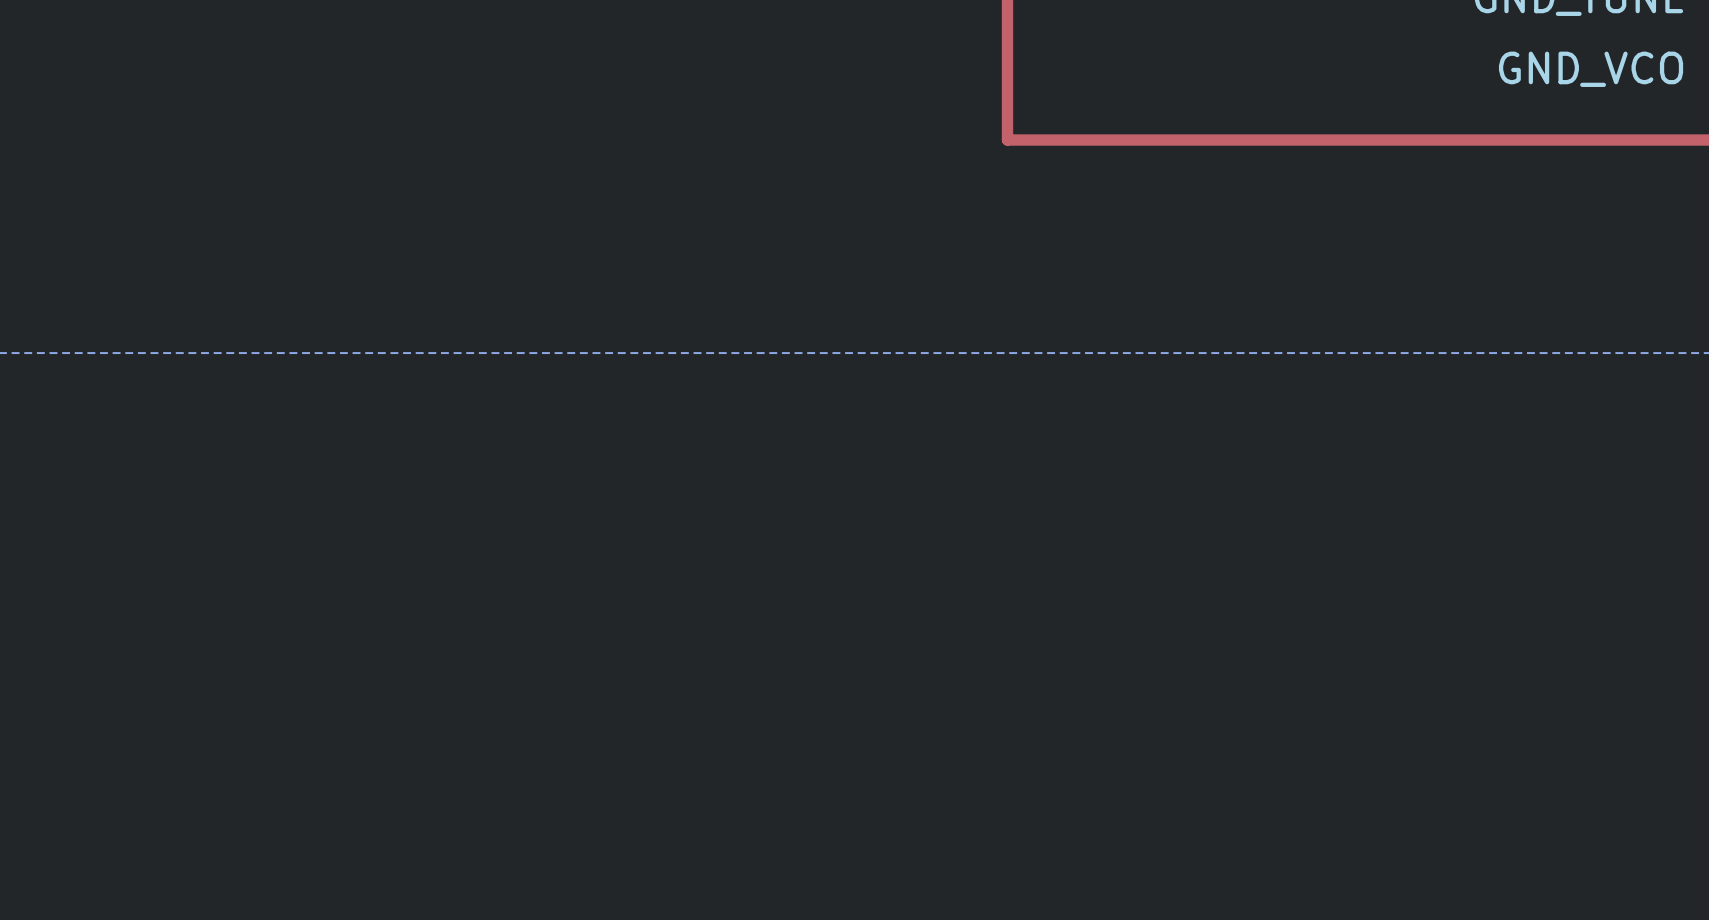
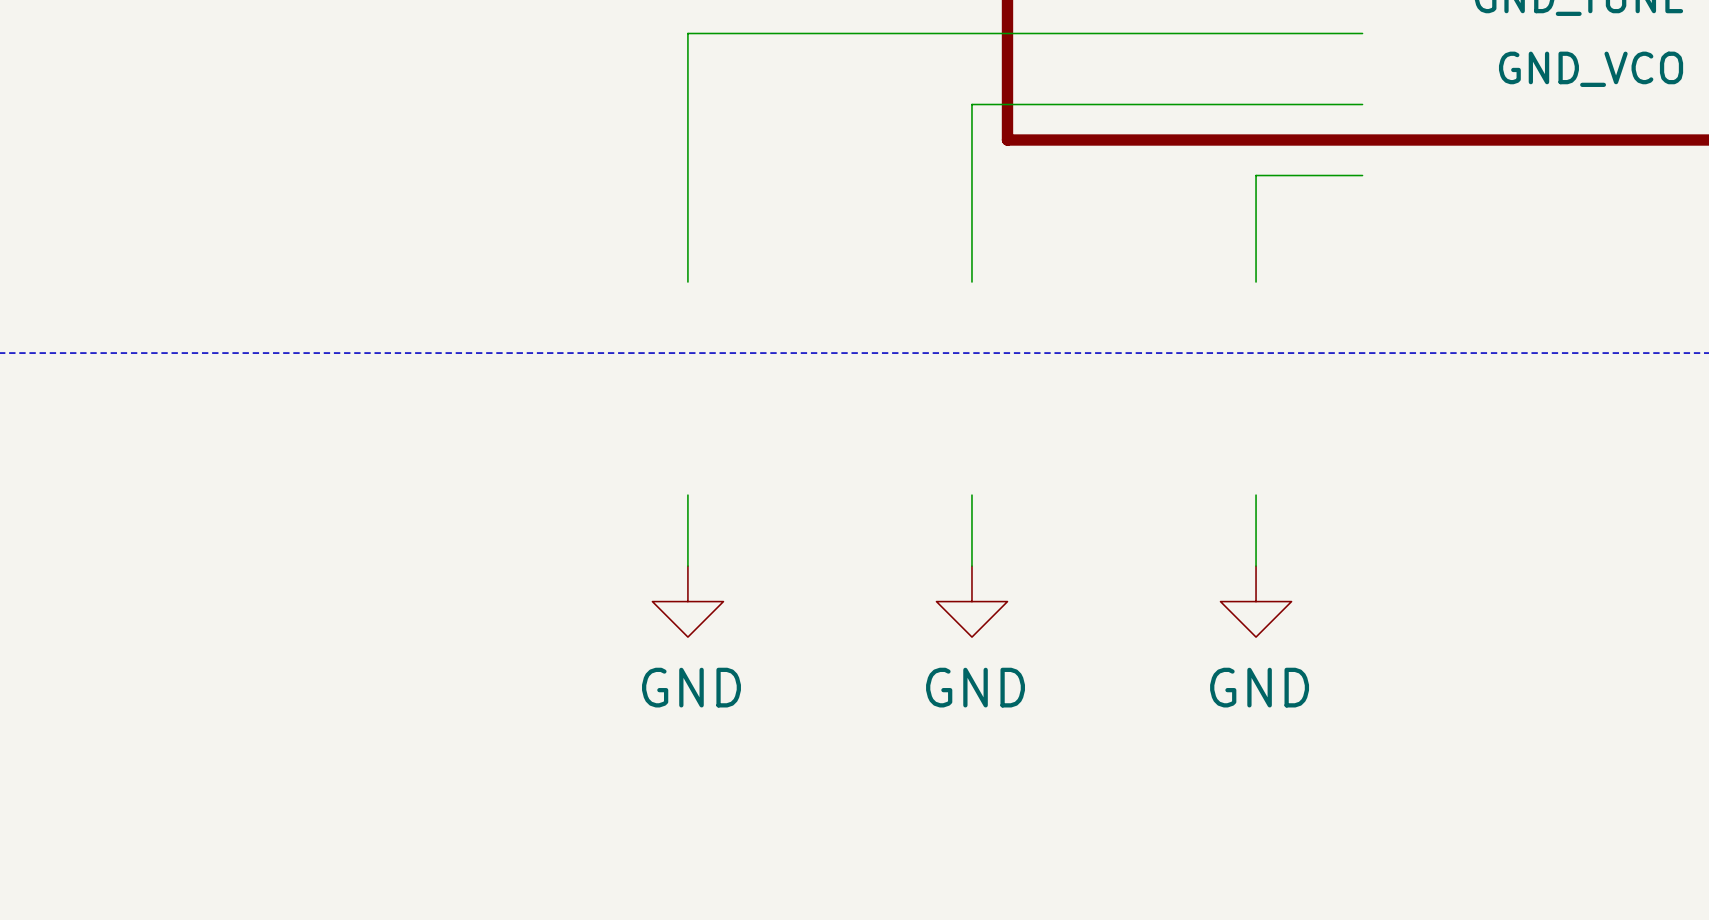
wire: none -> (1362, 33) (687, 33) (687, 282)
wire: none -> (1362, 104) (971, 104) (971, 282)
wire: none -> (1362, 175) (1256, 175) (1256, 282)
wire: none -> (687, 495) (687, 566)
wire: none -> (971, 495) (971, 566)
wire: none -> (1256, 495) (1256, 566)
power symbol: none -> GND (687, 601)
power symbol: none -> GND (971, 601)
power symbol: none -> GND (1256, 601)

